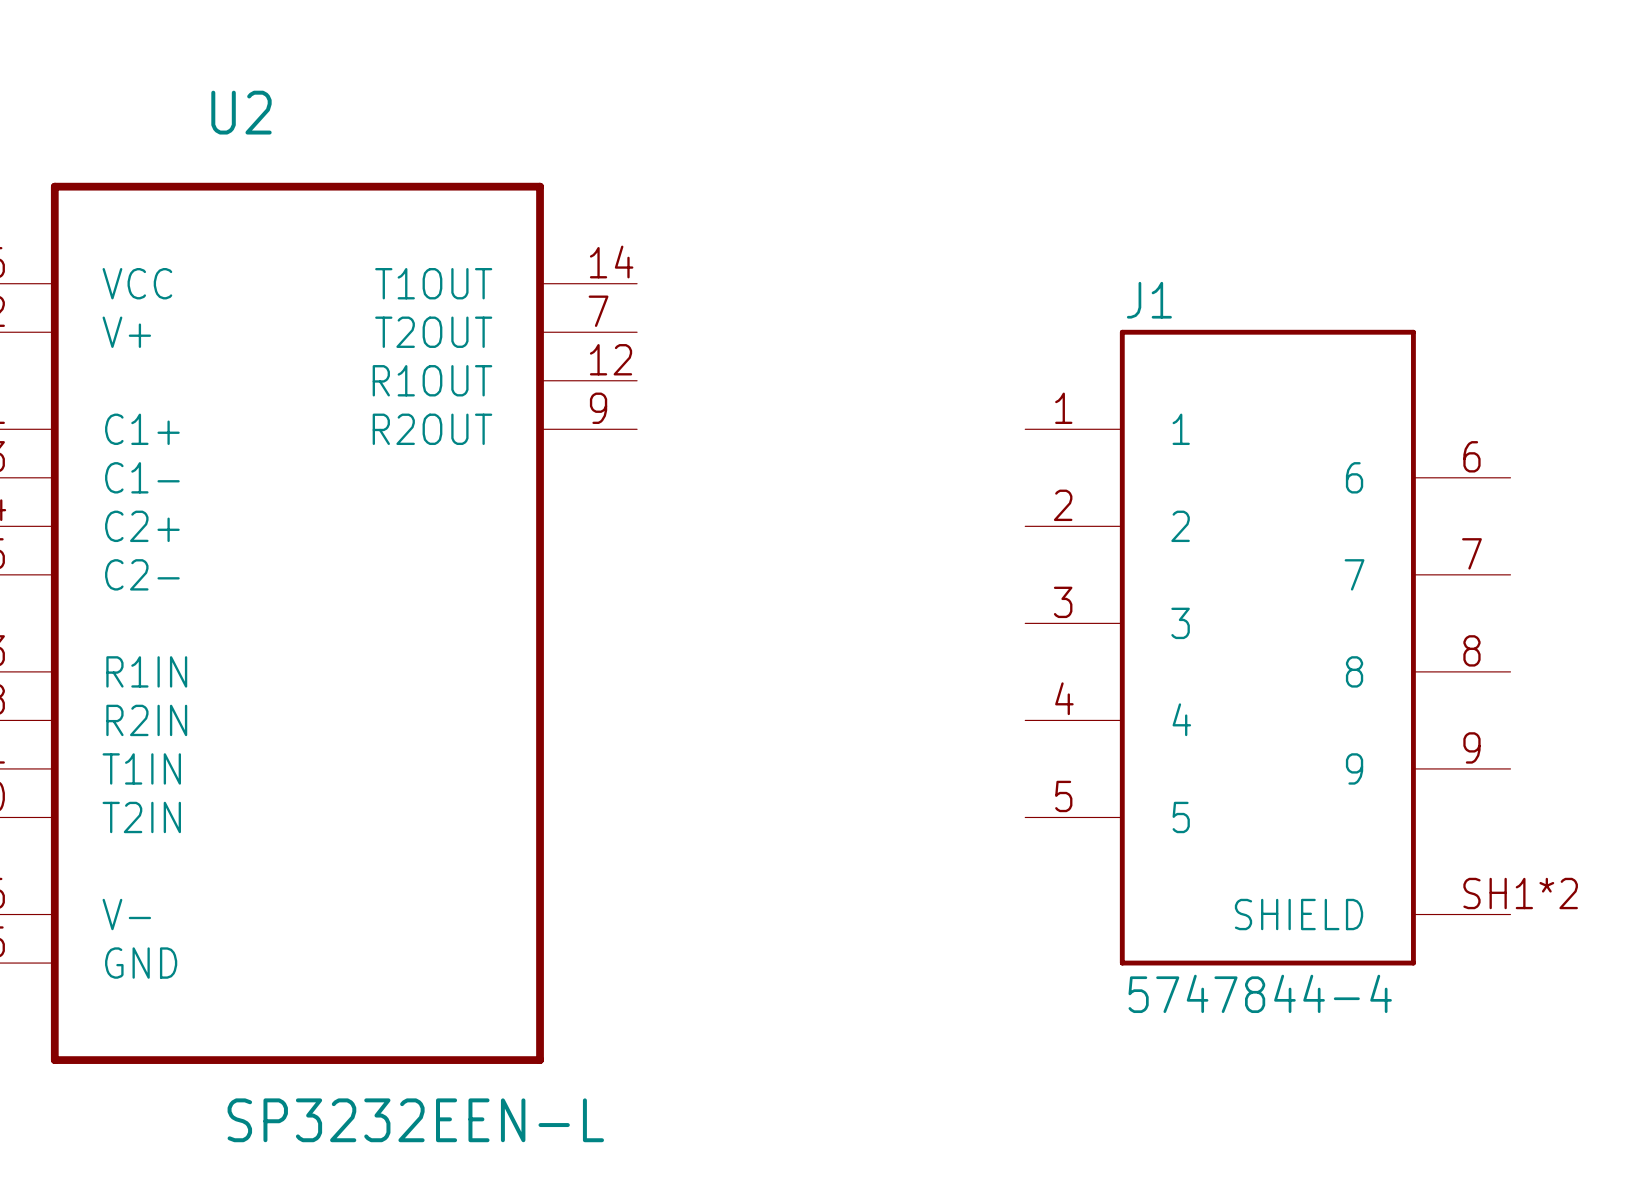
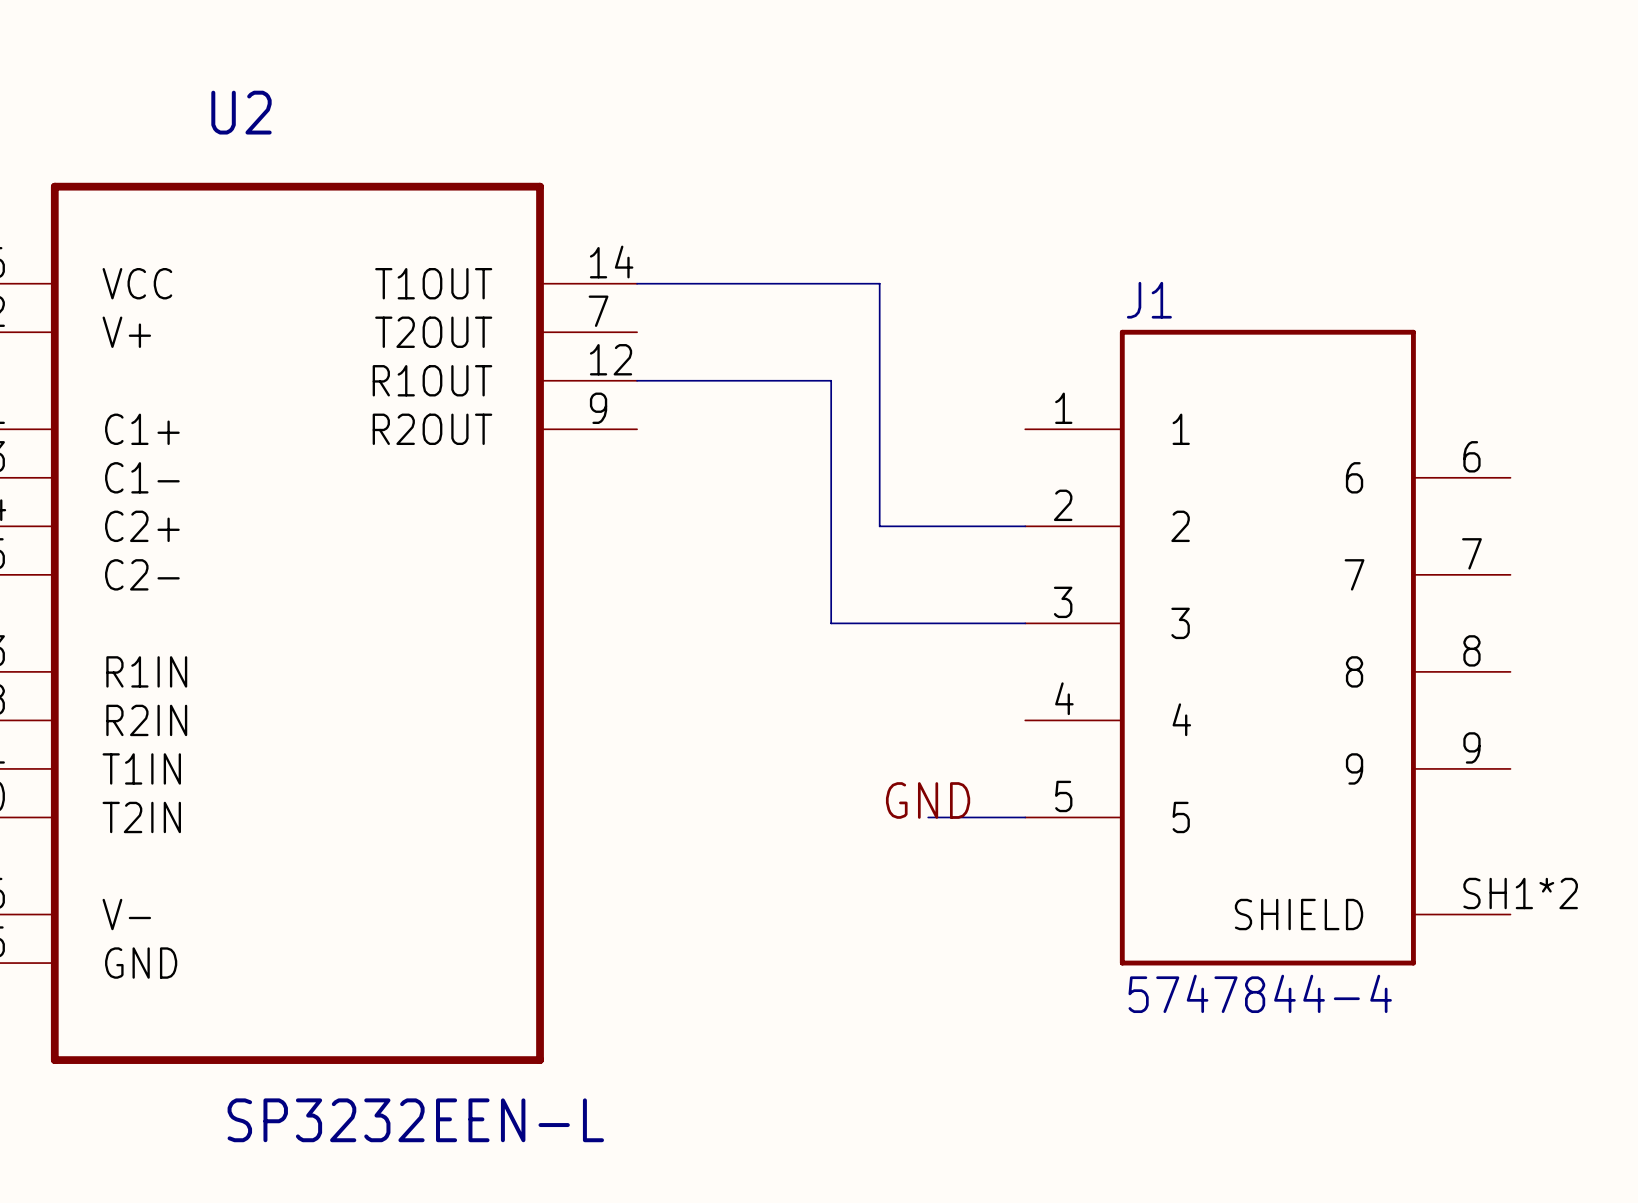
wire: none -> (637, 283) (879, 283) (879, 526) (1025, 526)
wire: none -> (637, 380) (831, 380) (831, 623) (1025, 623)
label: none -> GND (928, 800)
wire: none -> (928, 817) (1025, 817)

